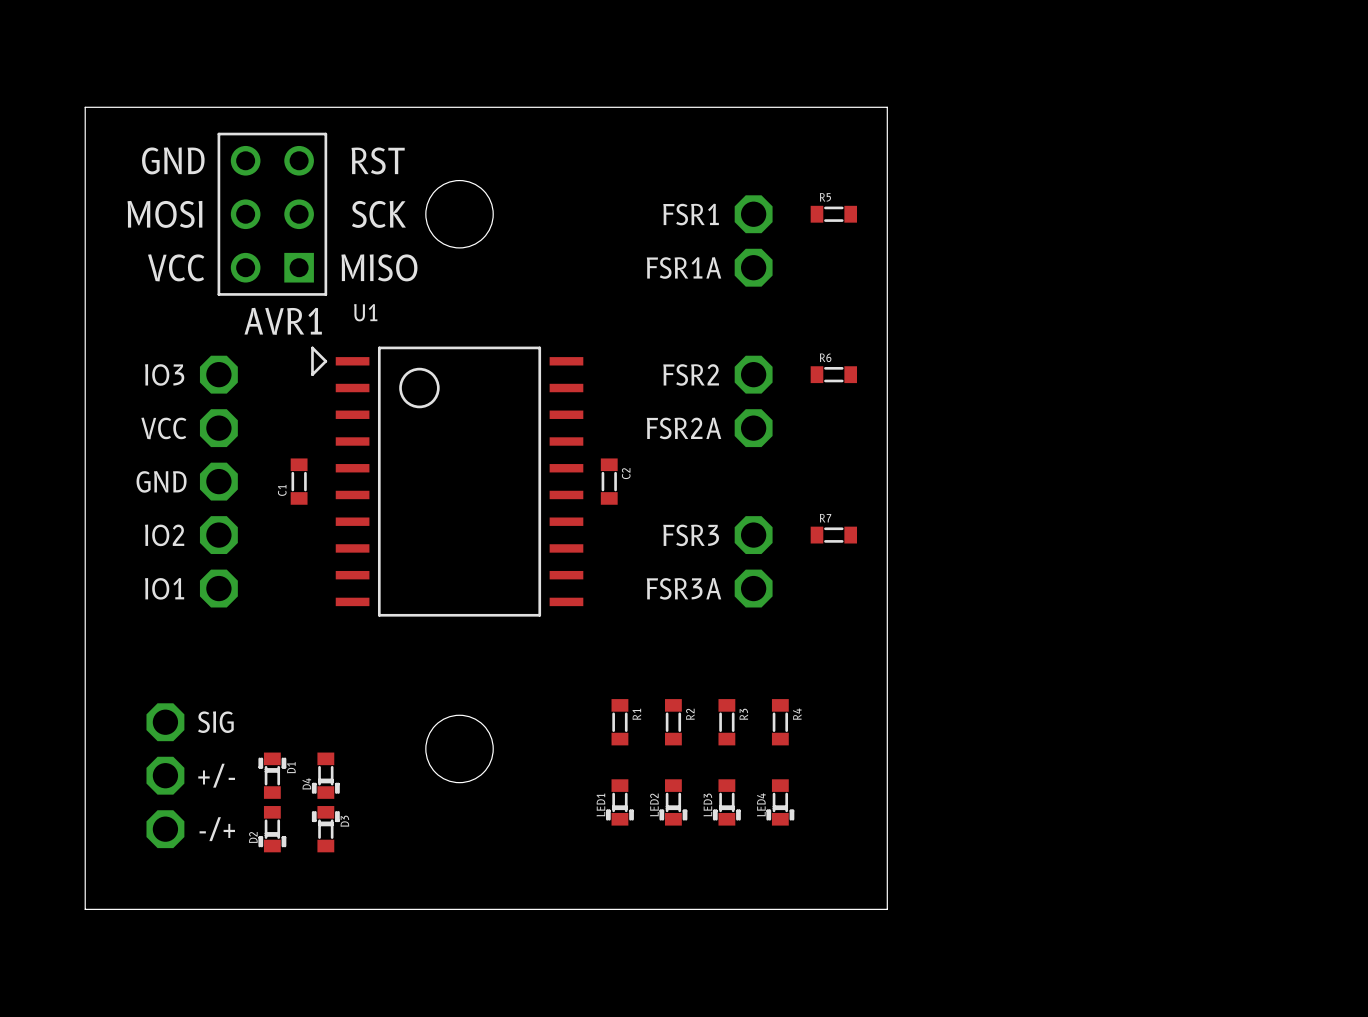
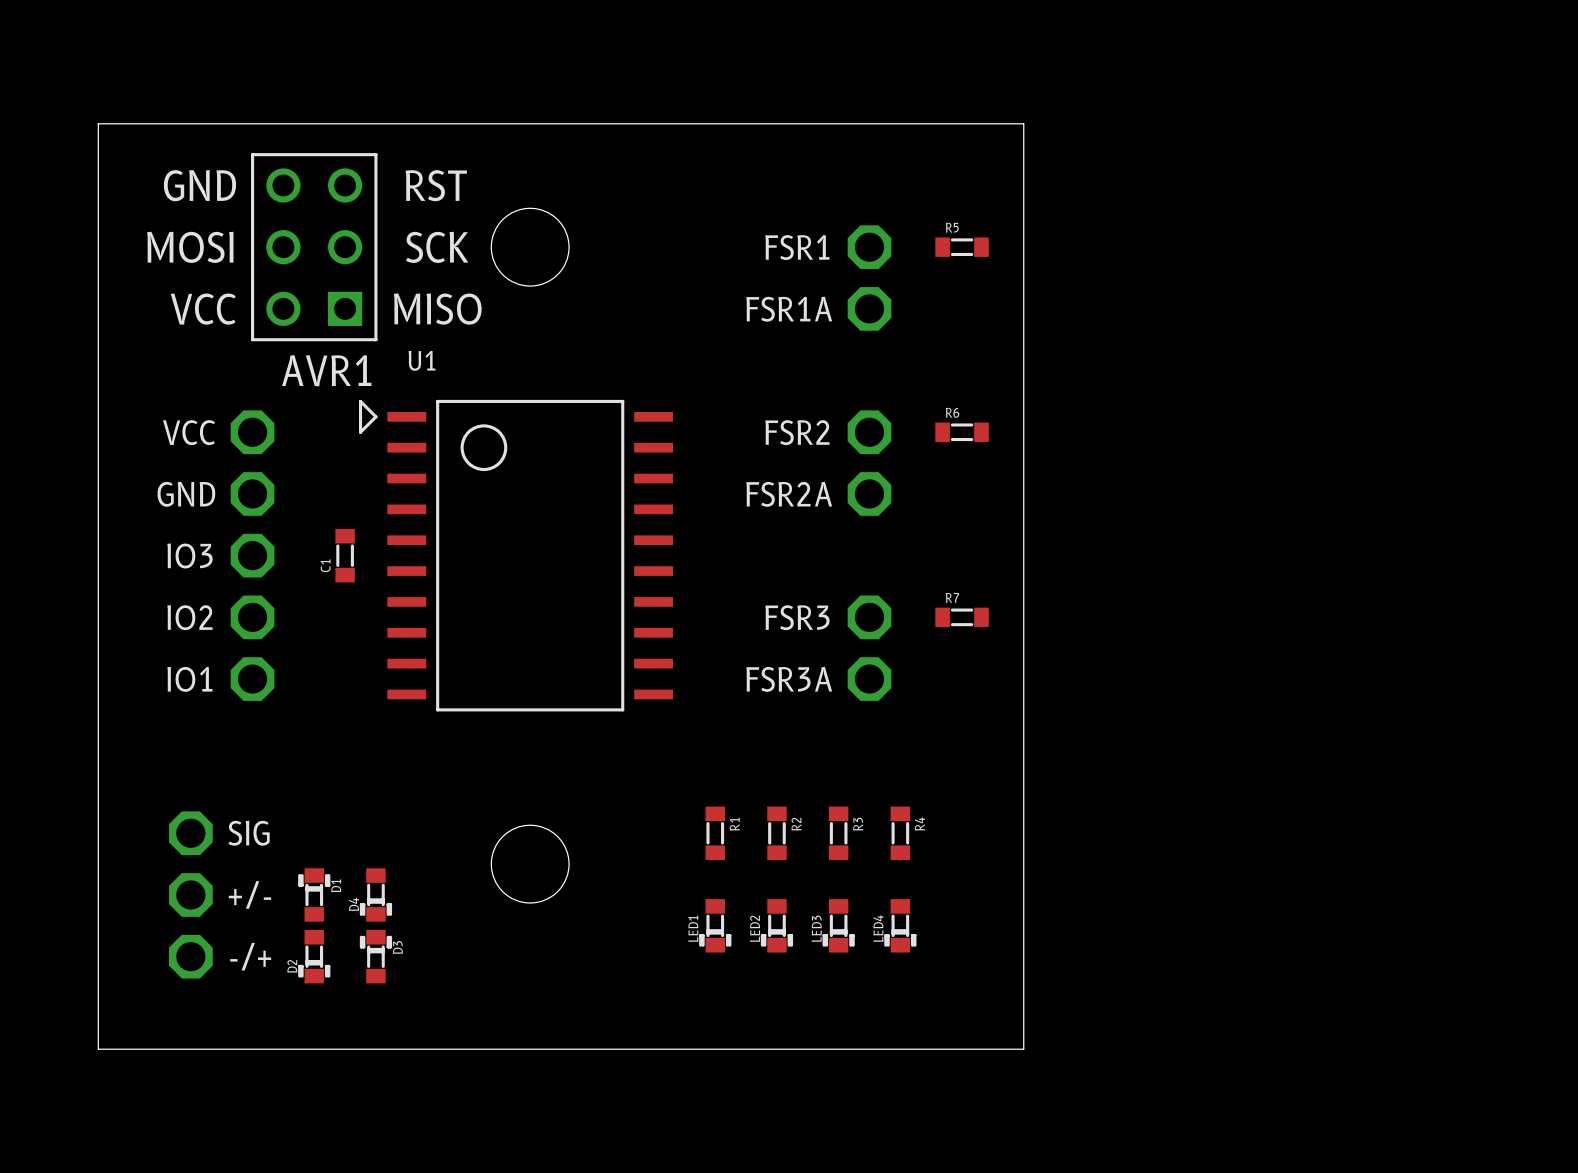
IO3 name: IO3 (164, 374) -> VCC (189, 432)
VCC name: VCC (163, 428) -> GND (186, 494)
GND name: GND (161, 481) -> IO3 (189, 555)
C2: (609, 481) -> none

